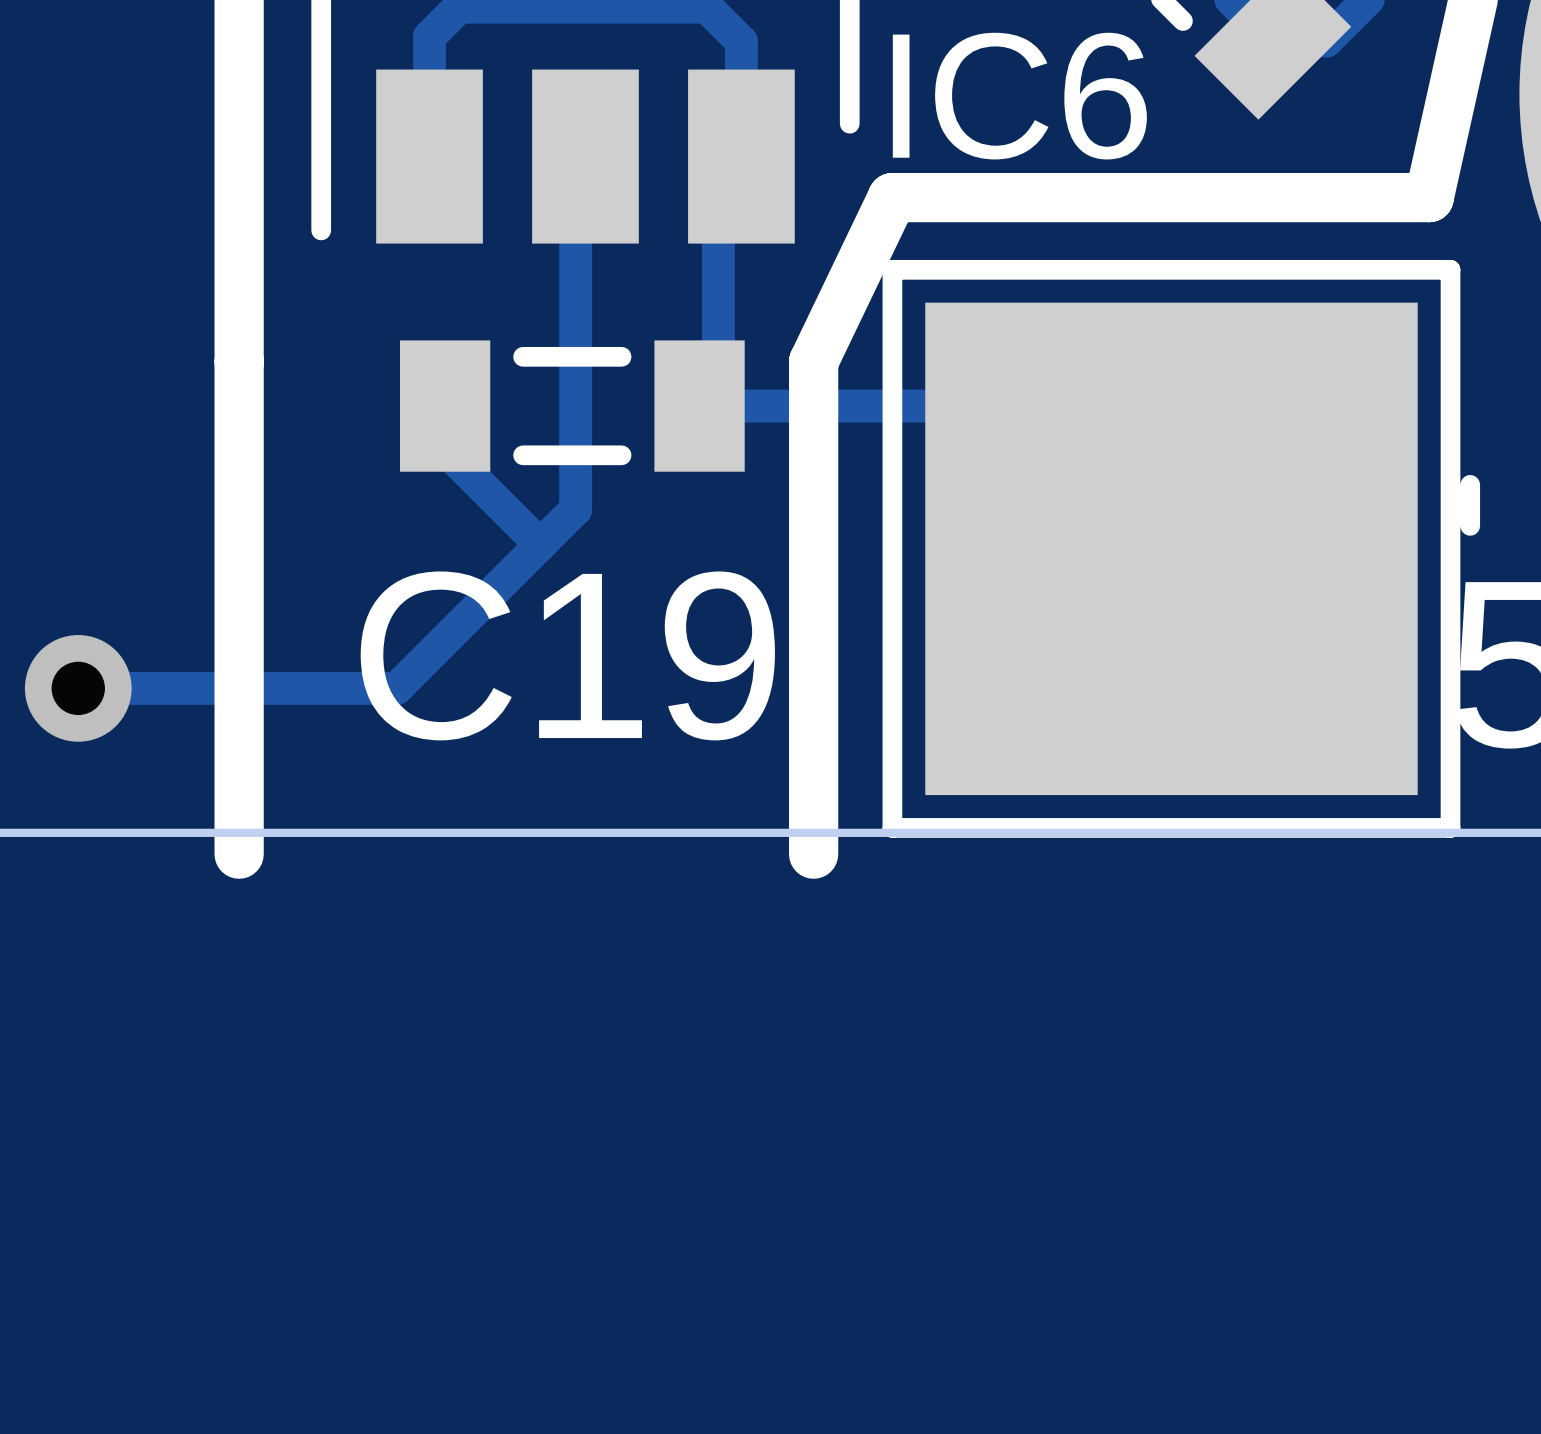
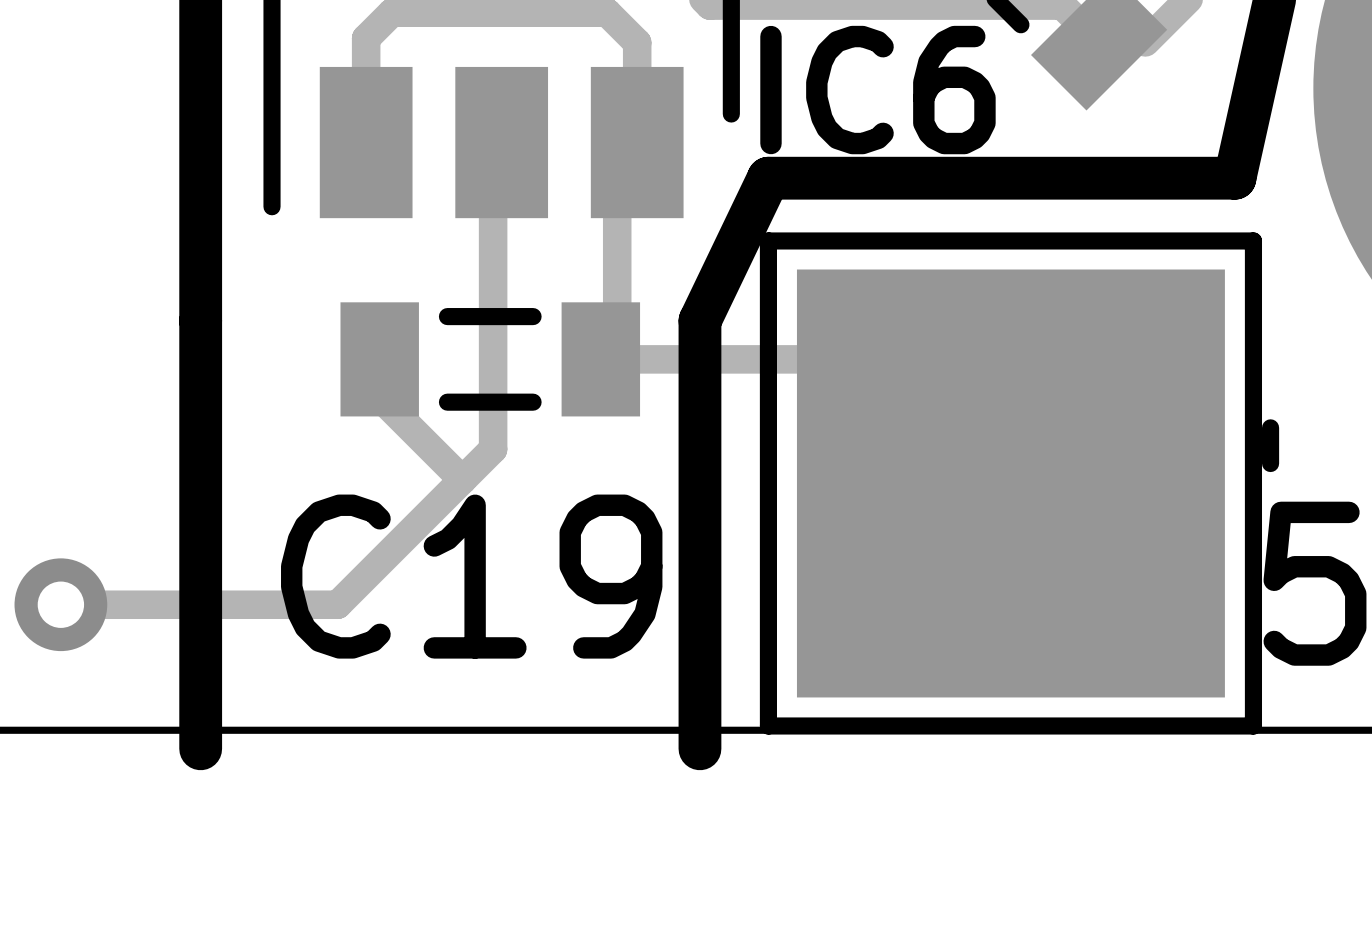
C19 name position: C19 (567, 655) -> C19 (471, 576)

